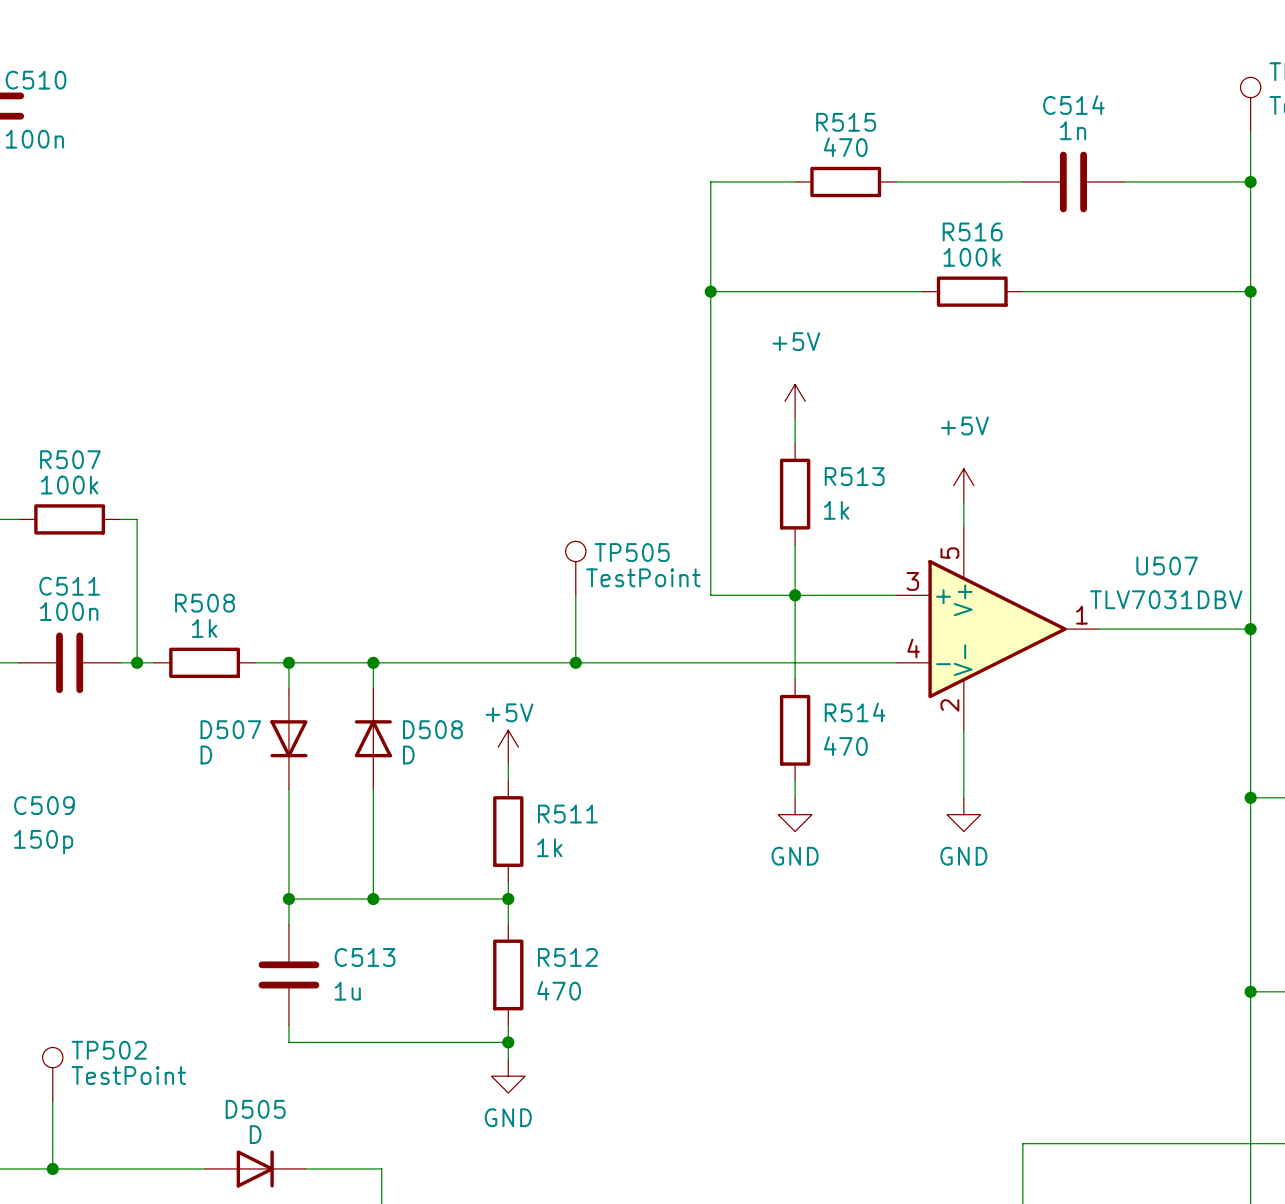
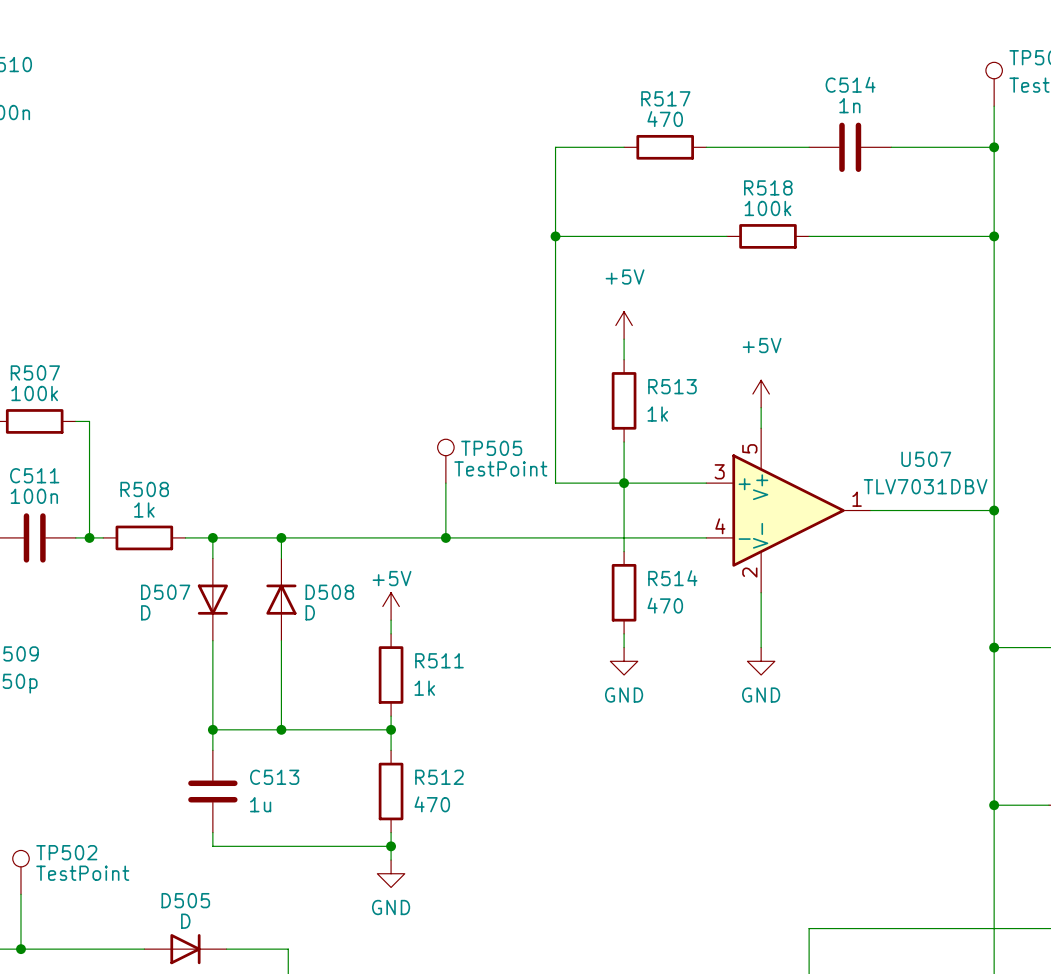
R515 name: R515 (846, 122) -> R517 (665, 98)
R516 name: R516 (972, 231) -> R518 (768, 187)

